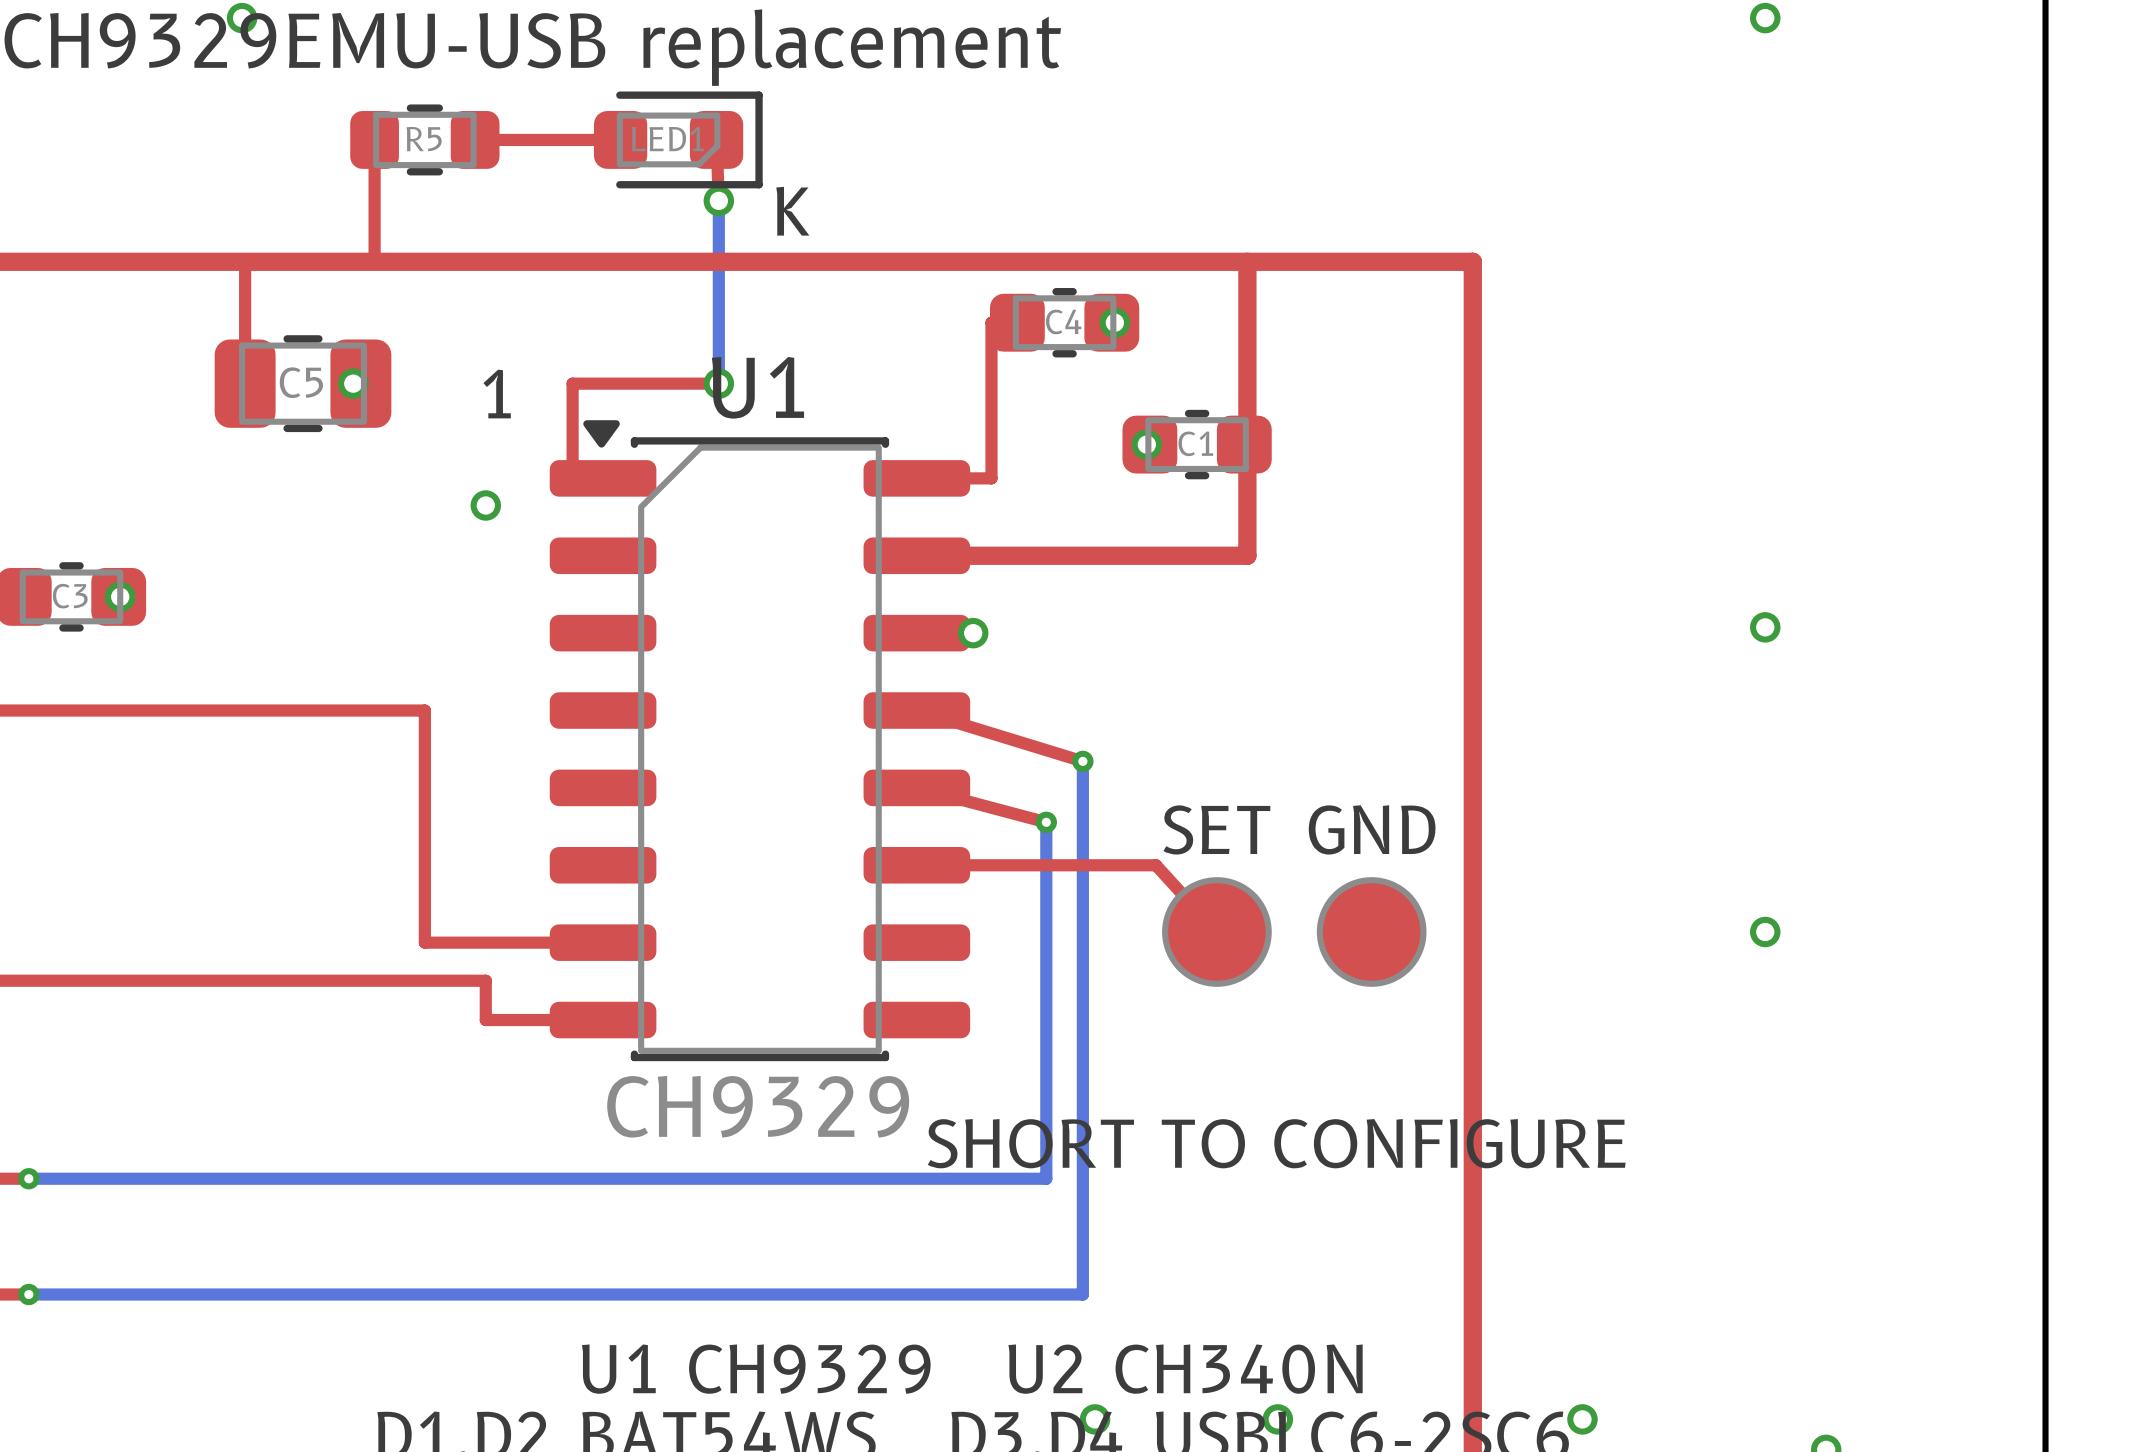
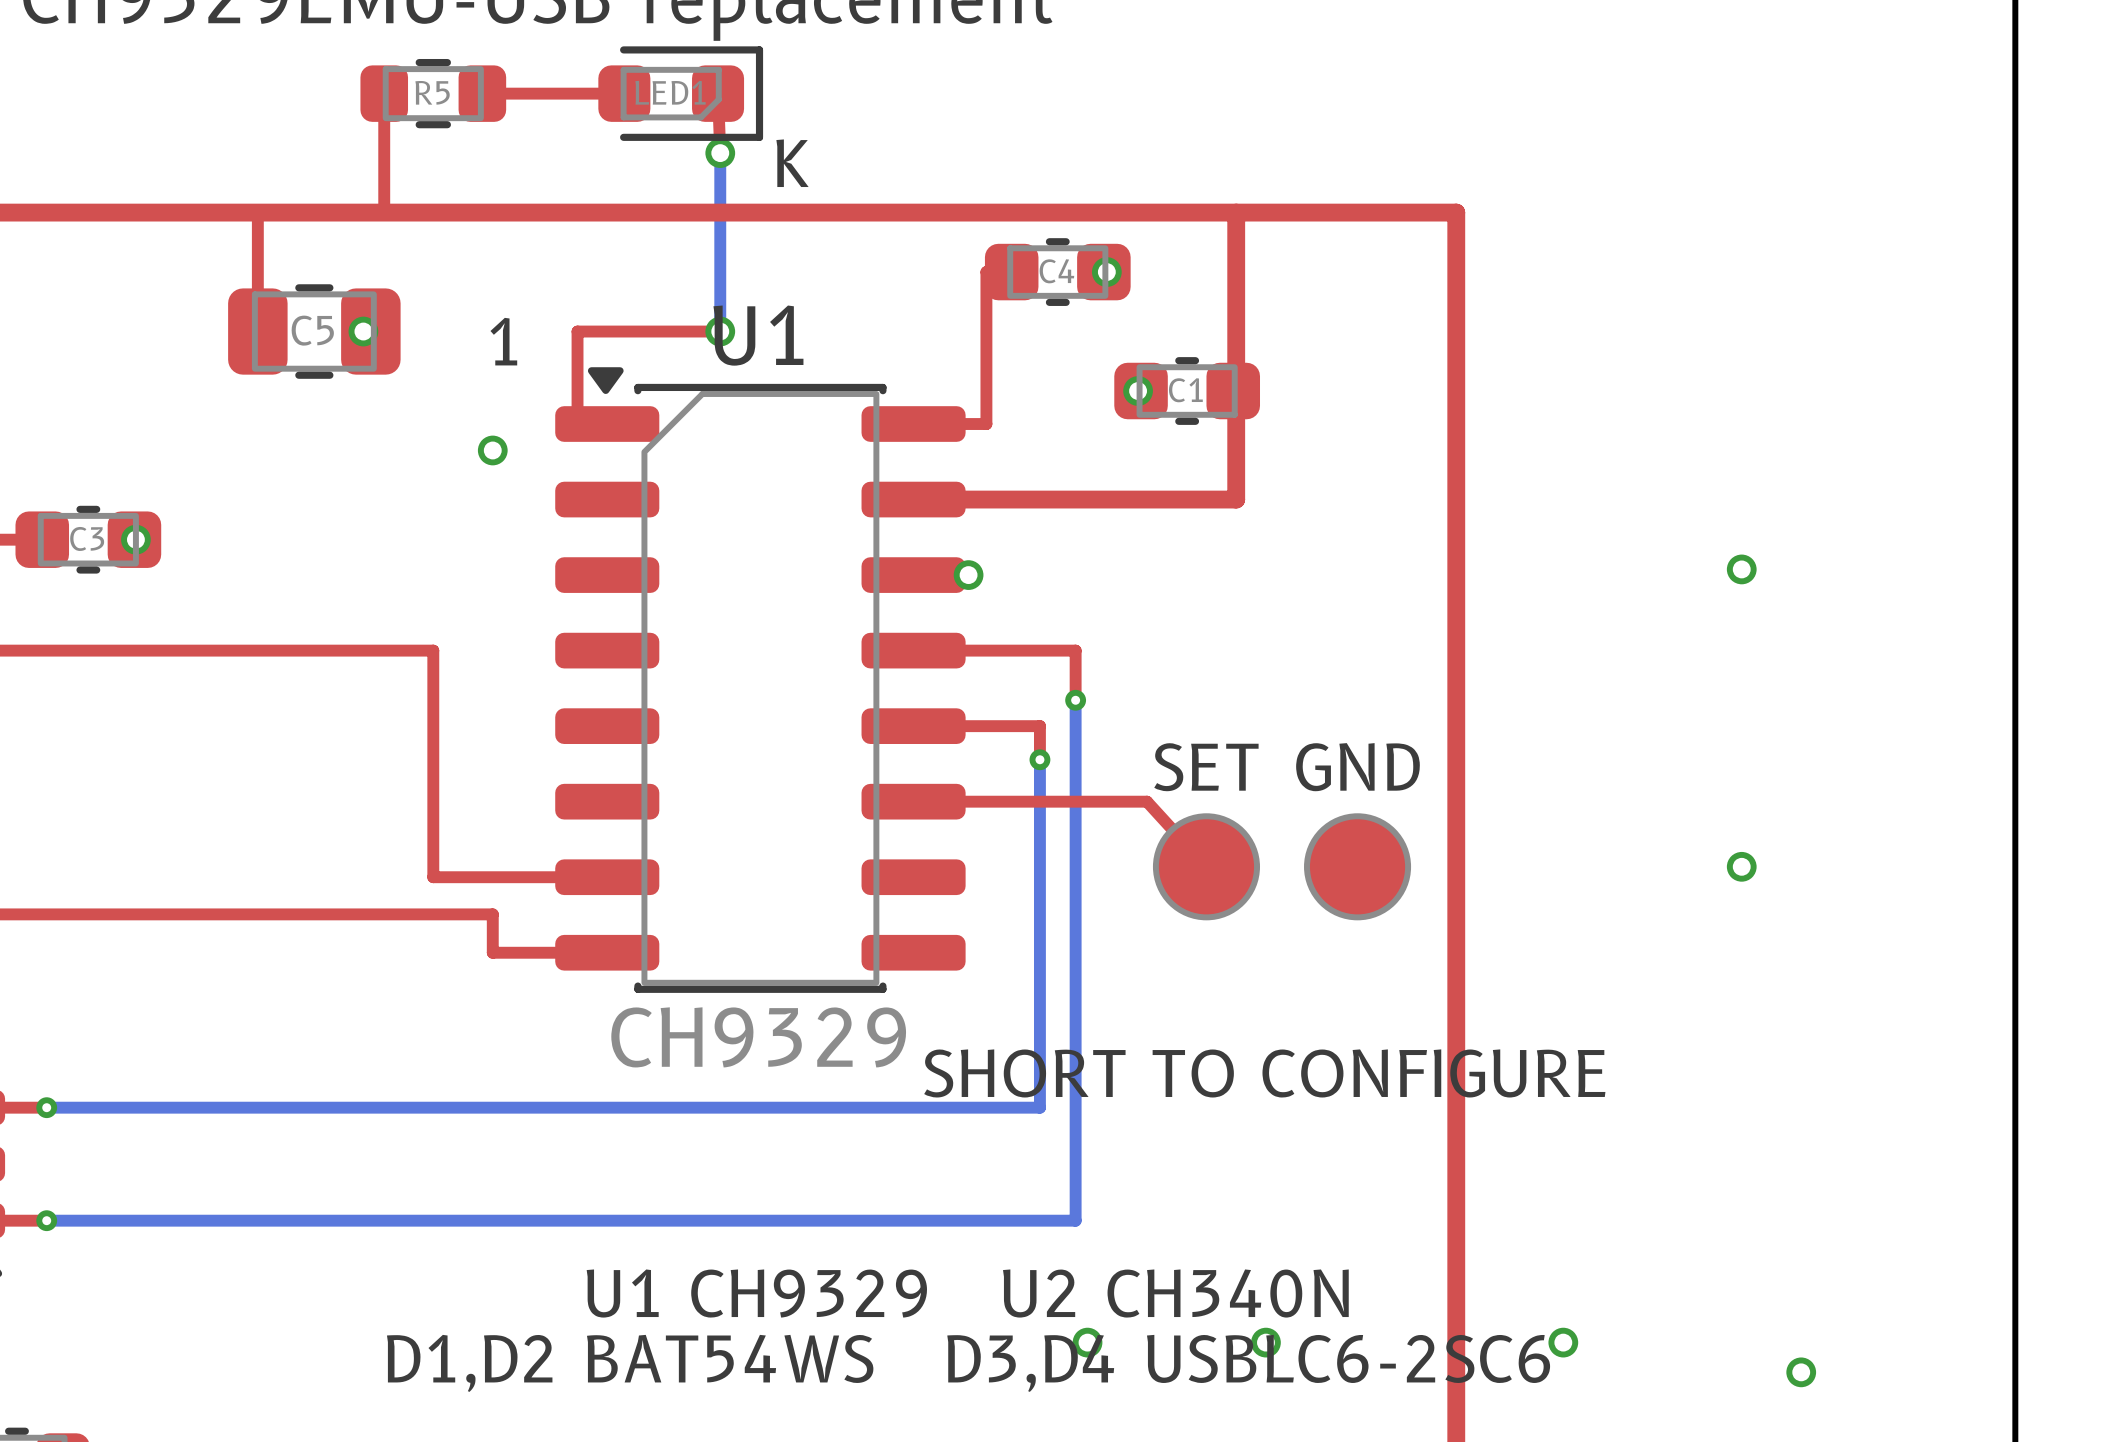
top track: (916, 710) (1082, 761) -> (913, 650) (1075, 650) (1075, 700)
top track: (916, 787) (1046, 822) -> (913, 726) (1039, 726) (1039, 759)

